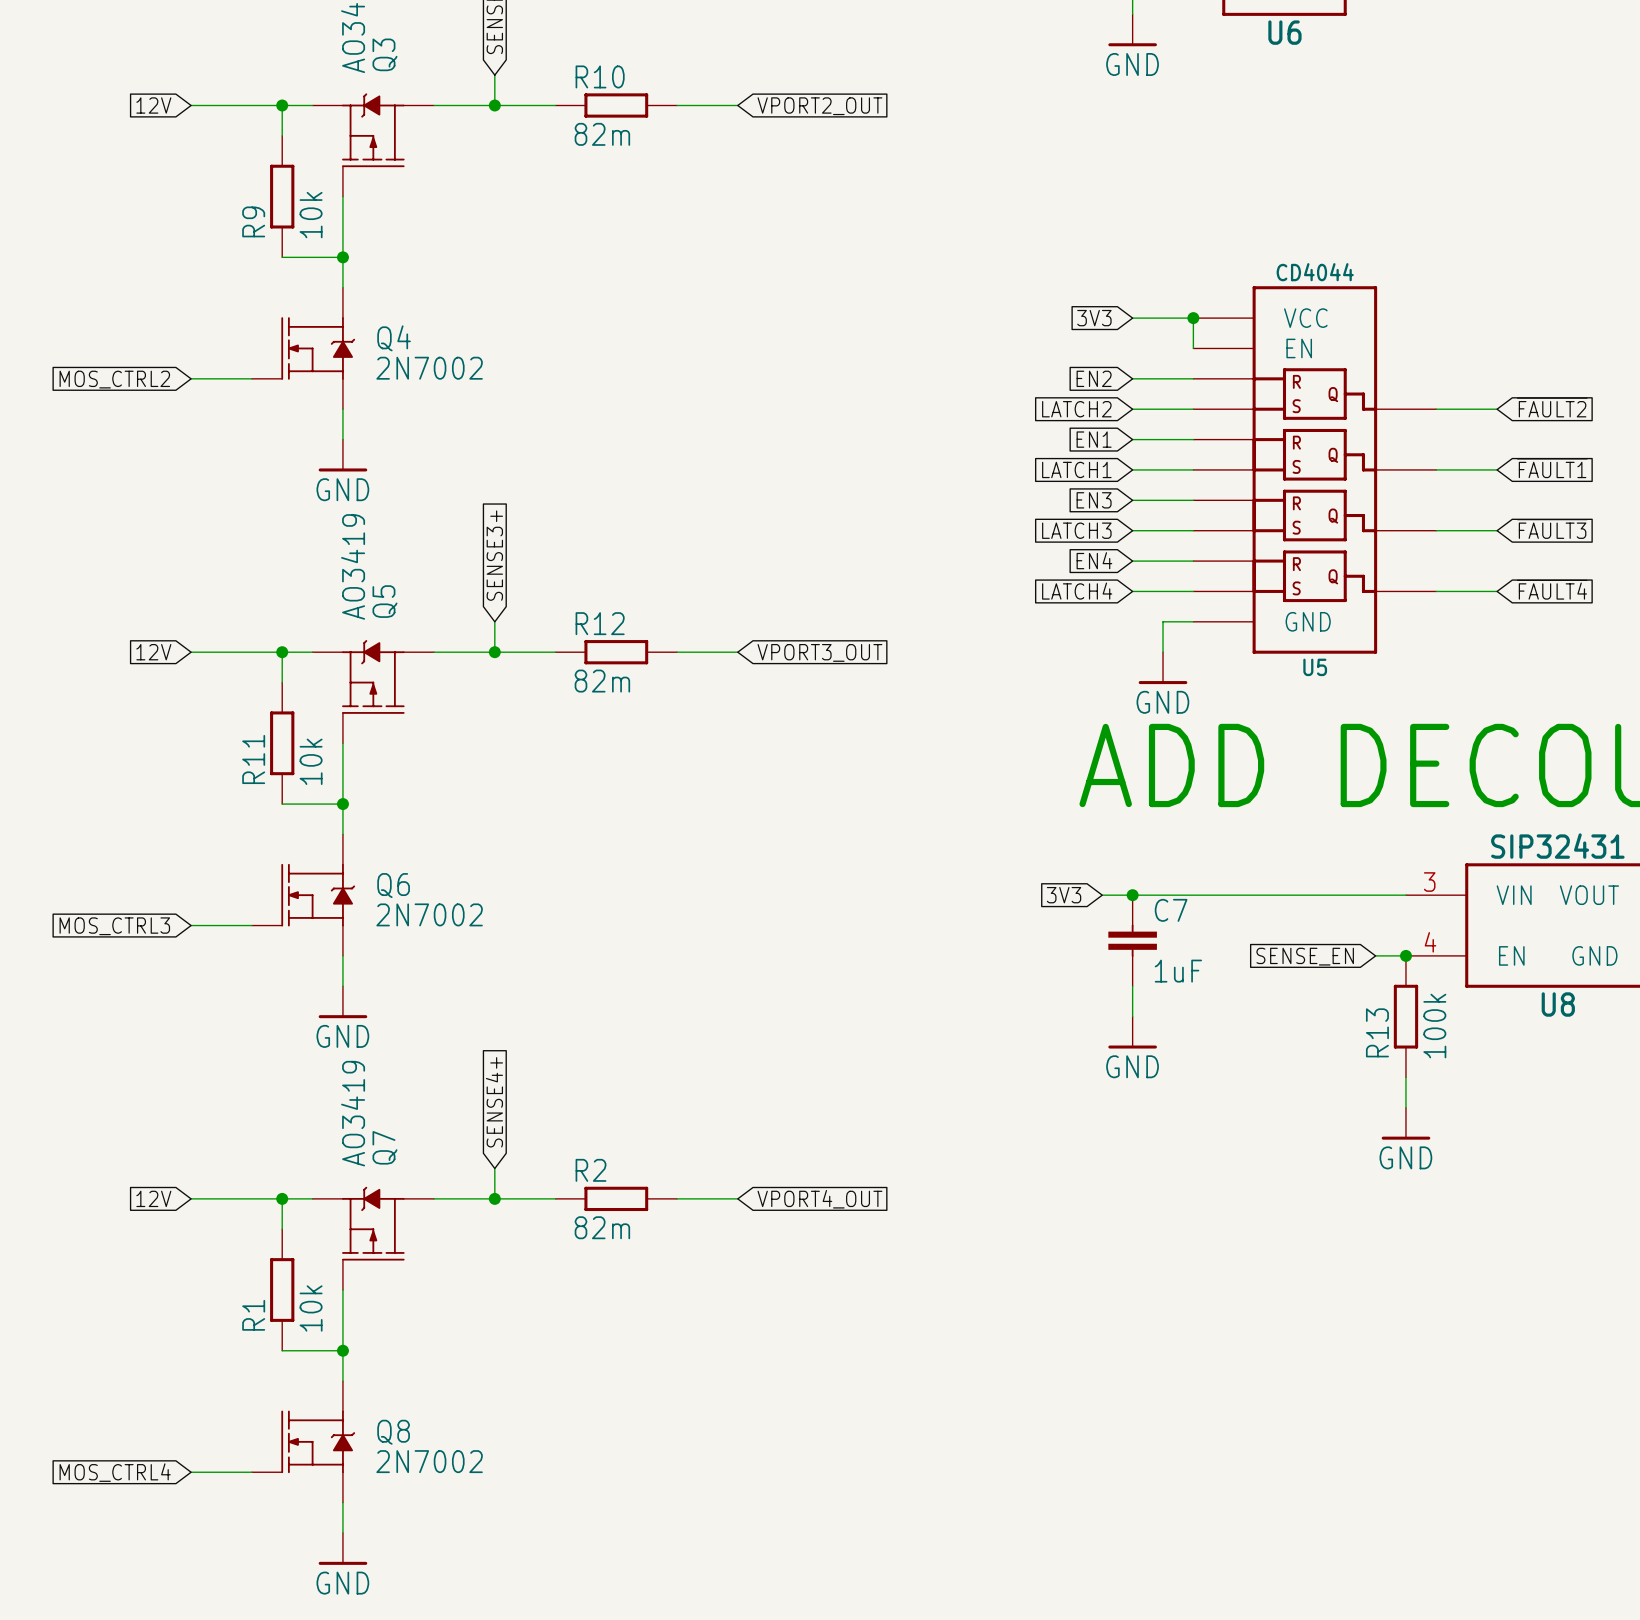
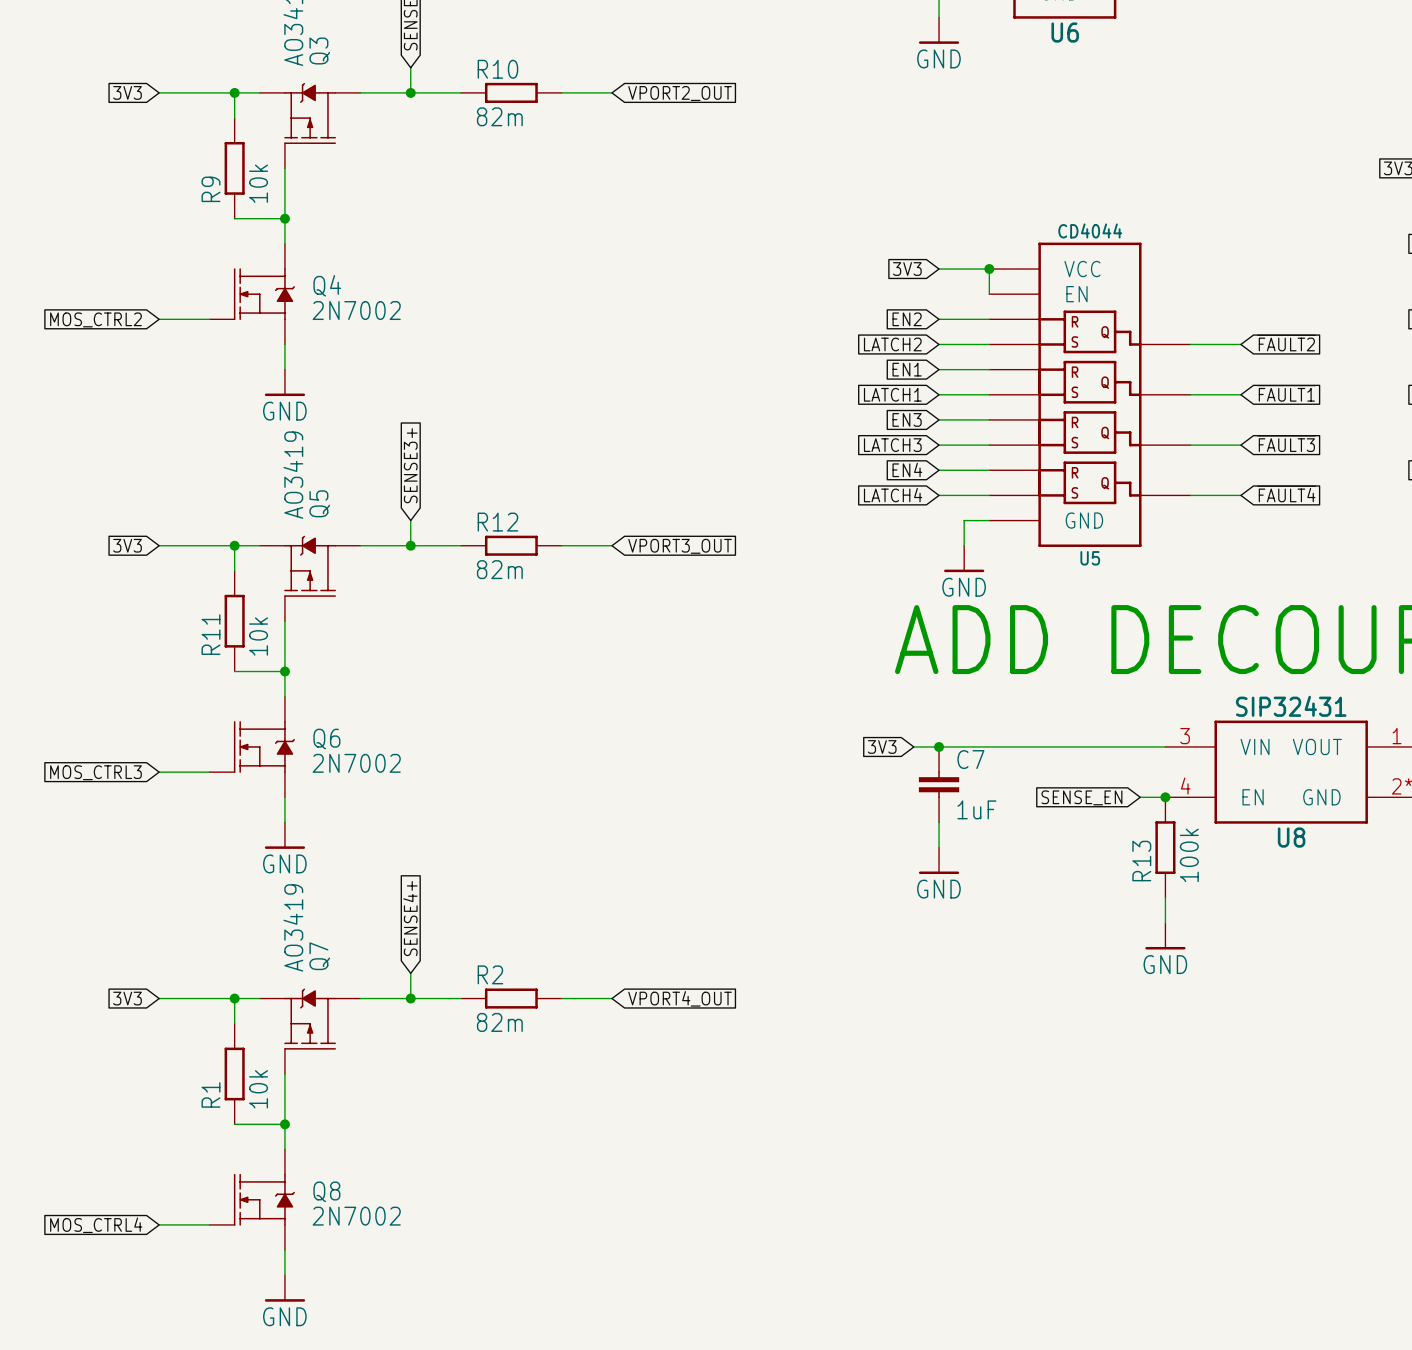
global label: 12V (153, 105) -> 3V3 (127, 92)
global label: 12V (153, 652) -> 3V3 (127, 545)
global label: 12V (153, 1198) -> 3V3 (127, 998)

